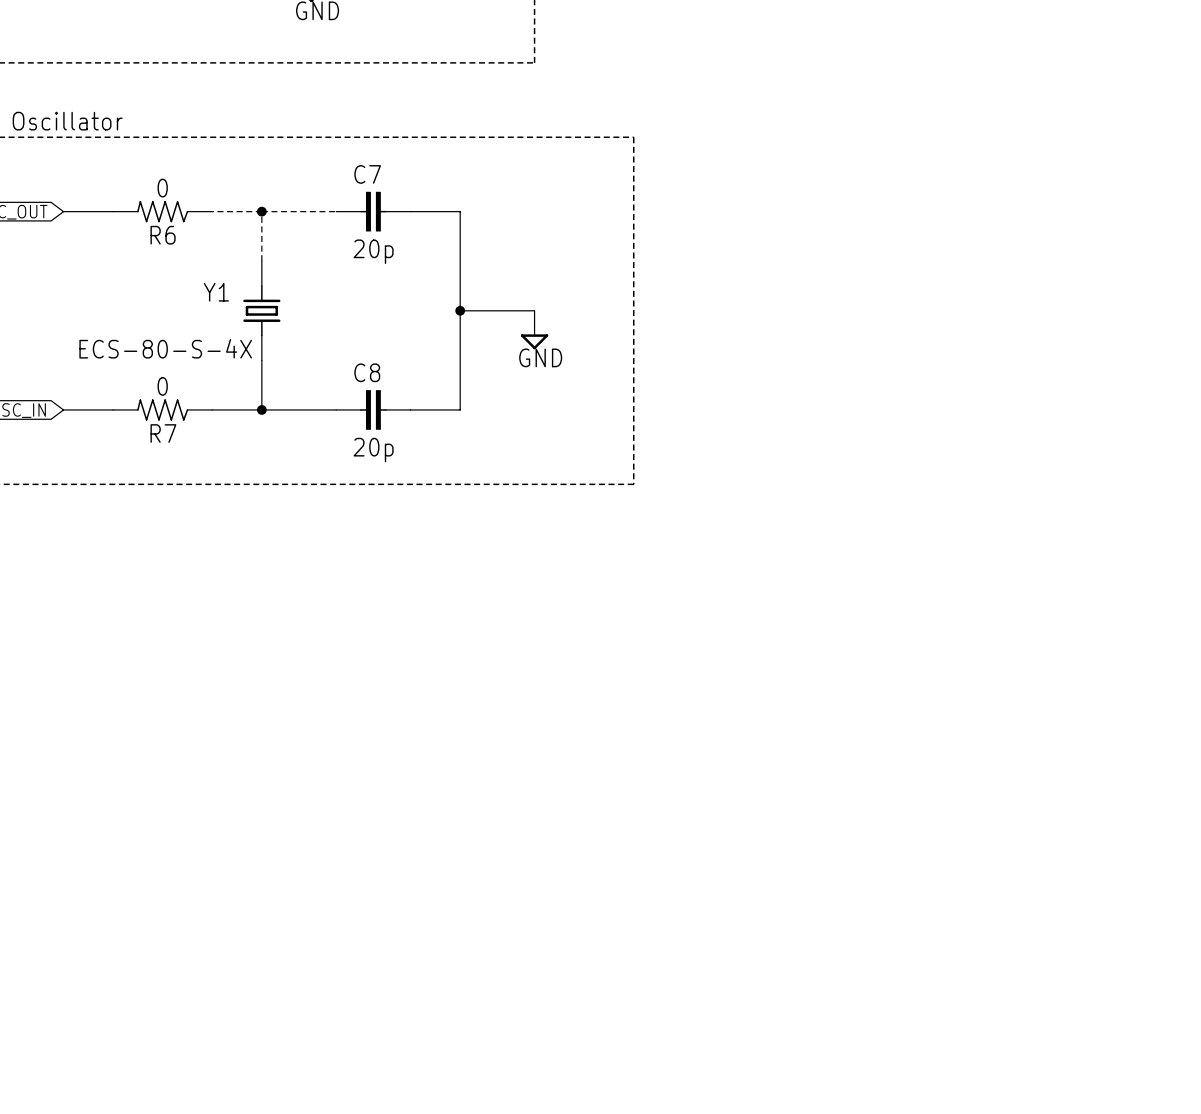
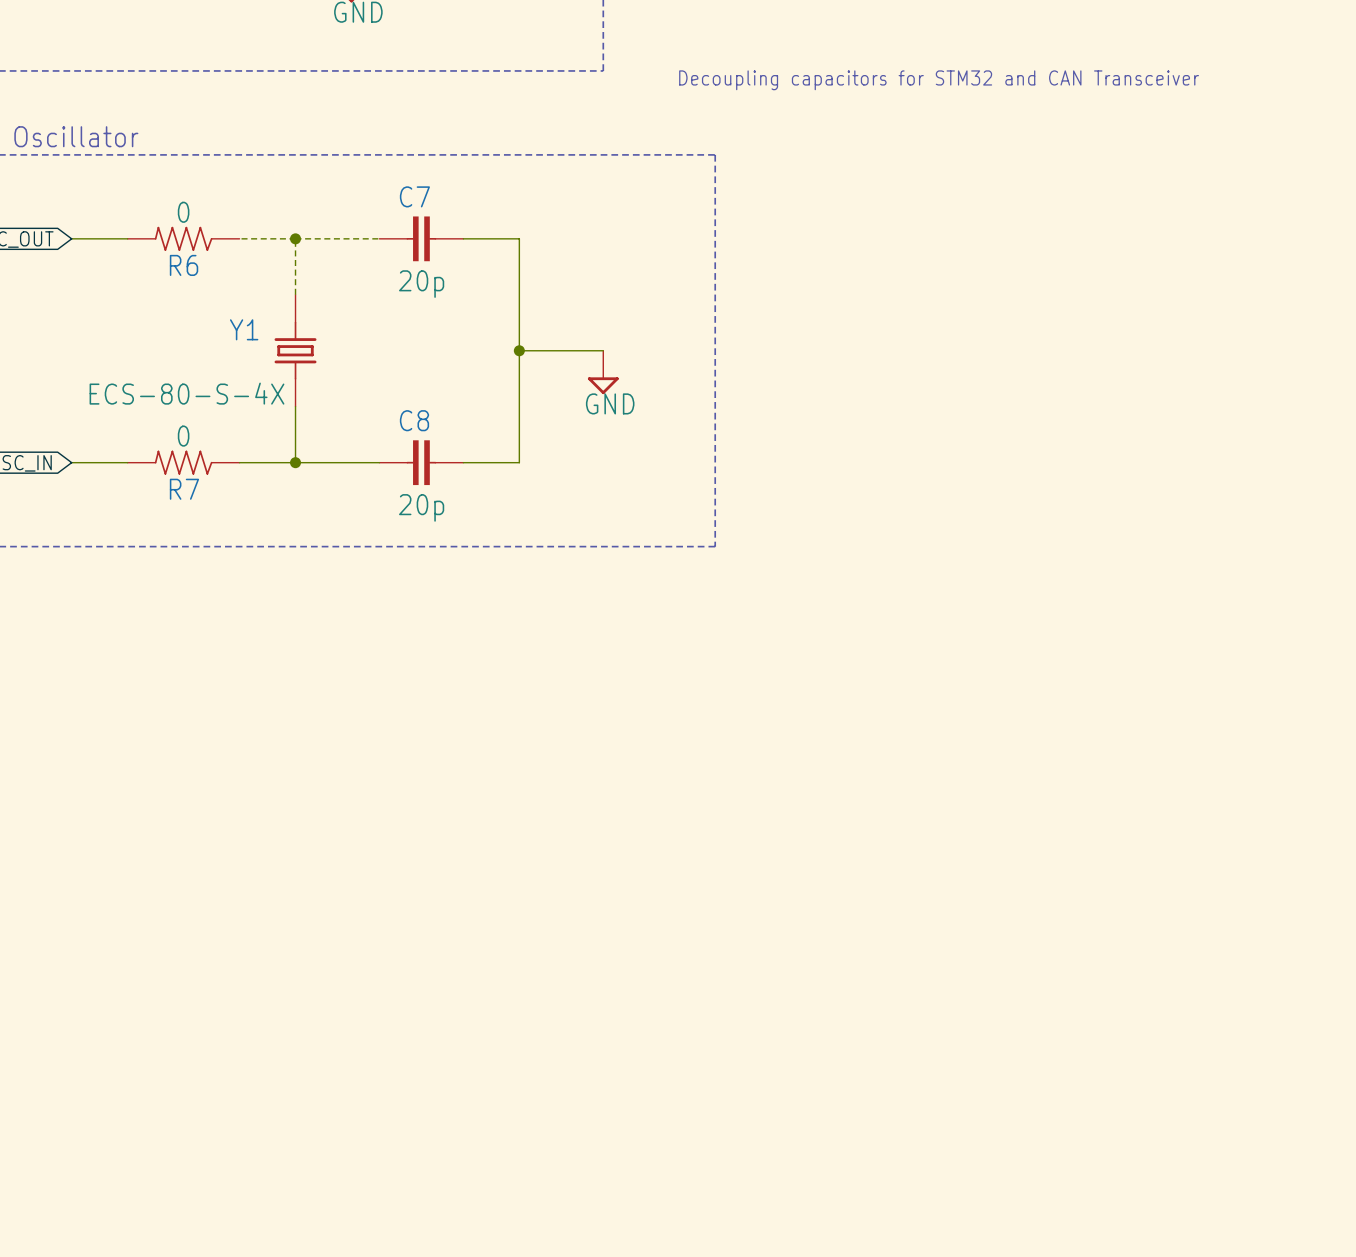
text: none -> Decoupling capacitors for STM32 and CAN Transceiver (939, 80)

